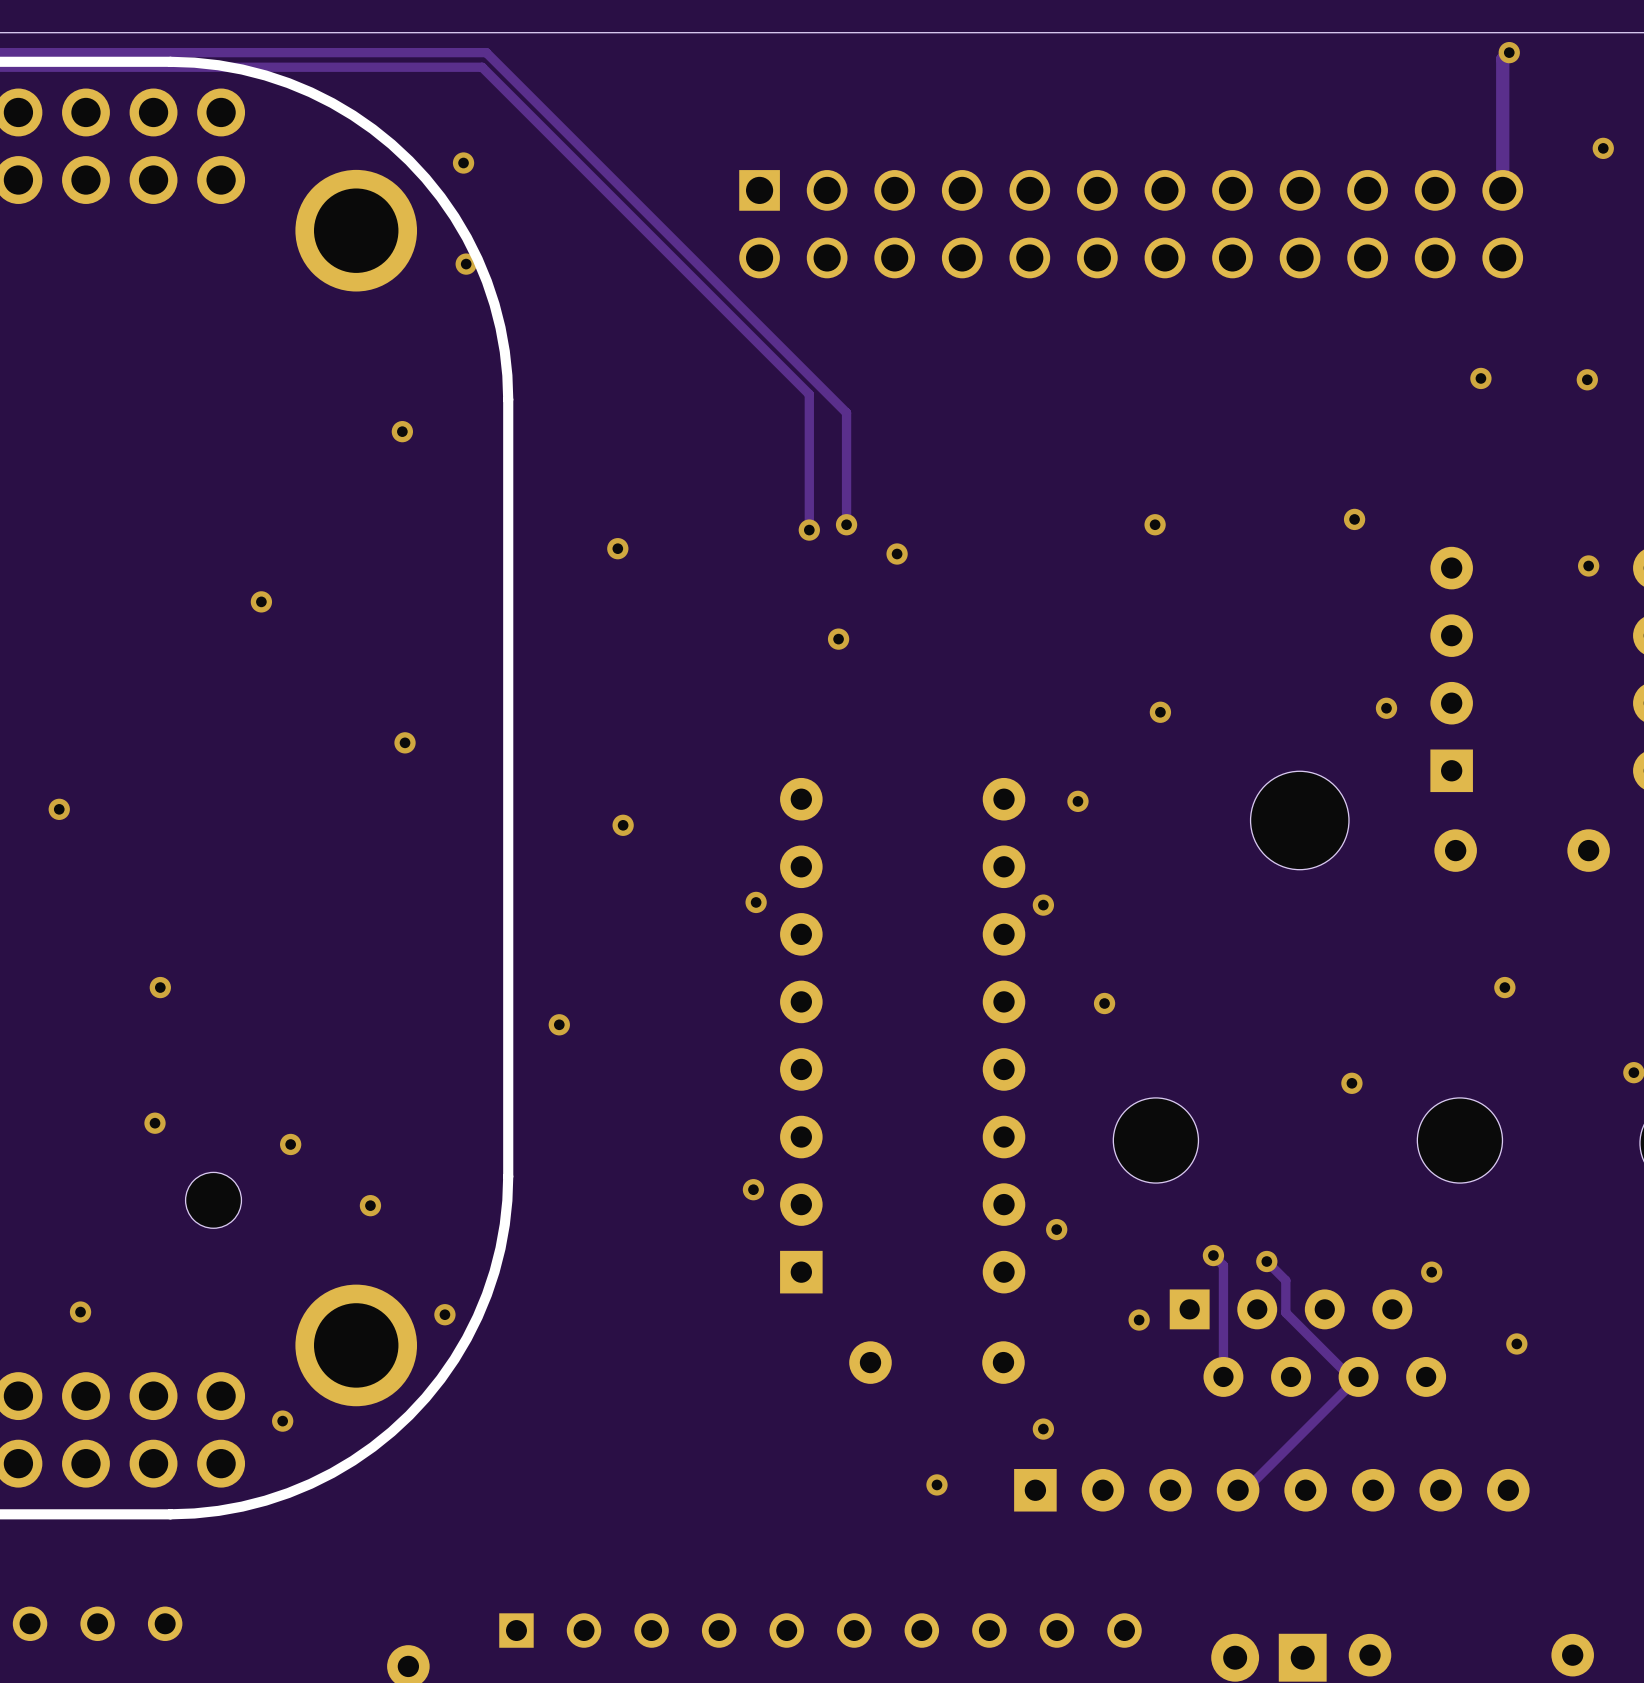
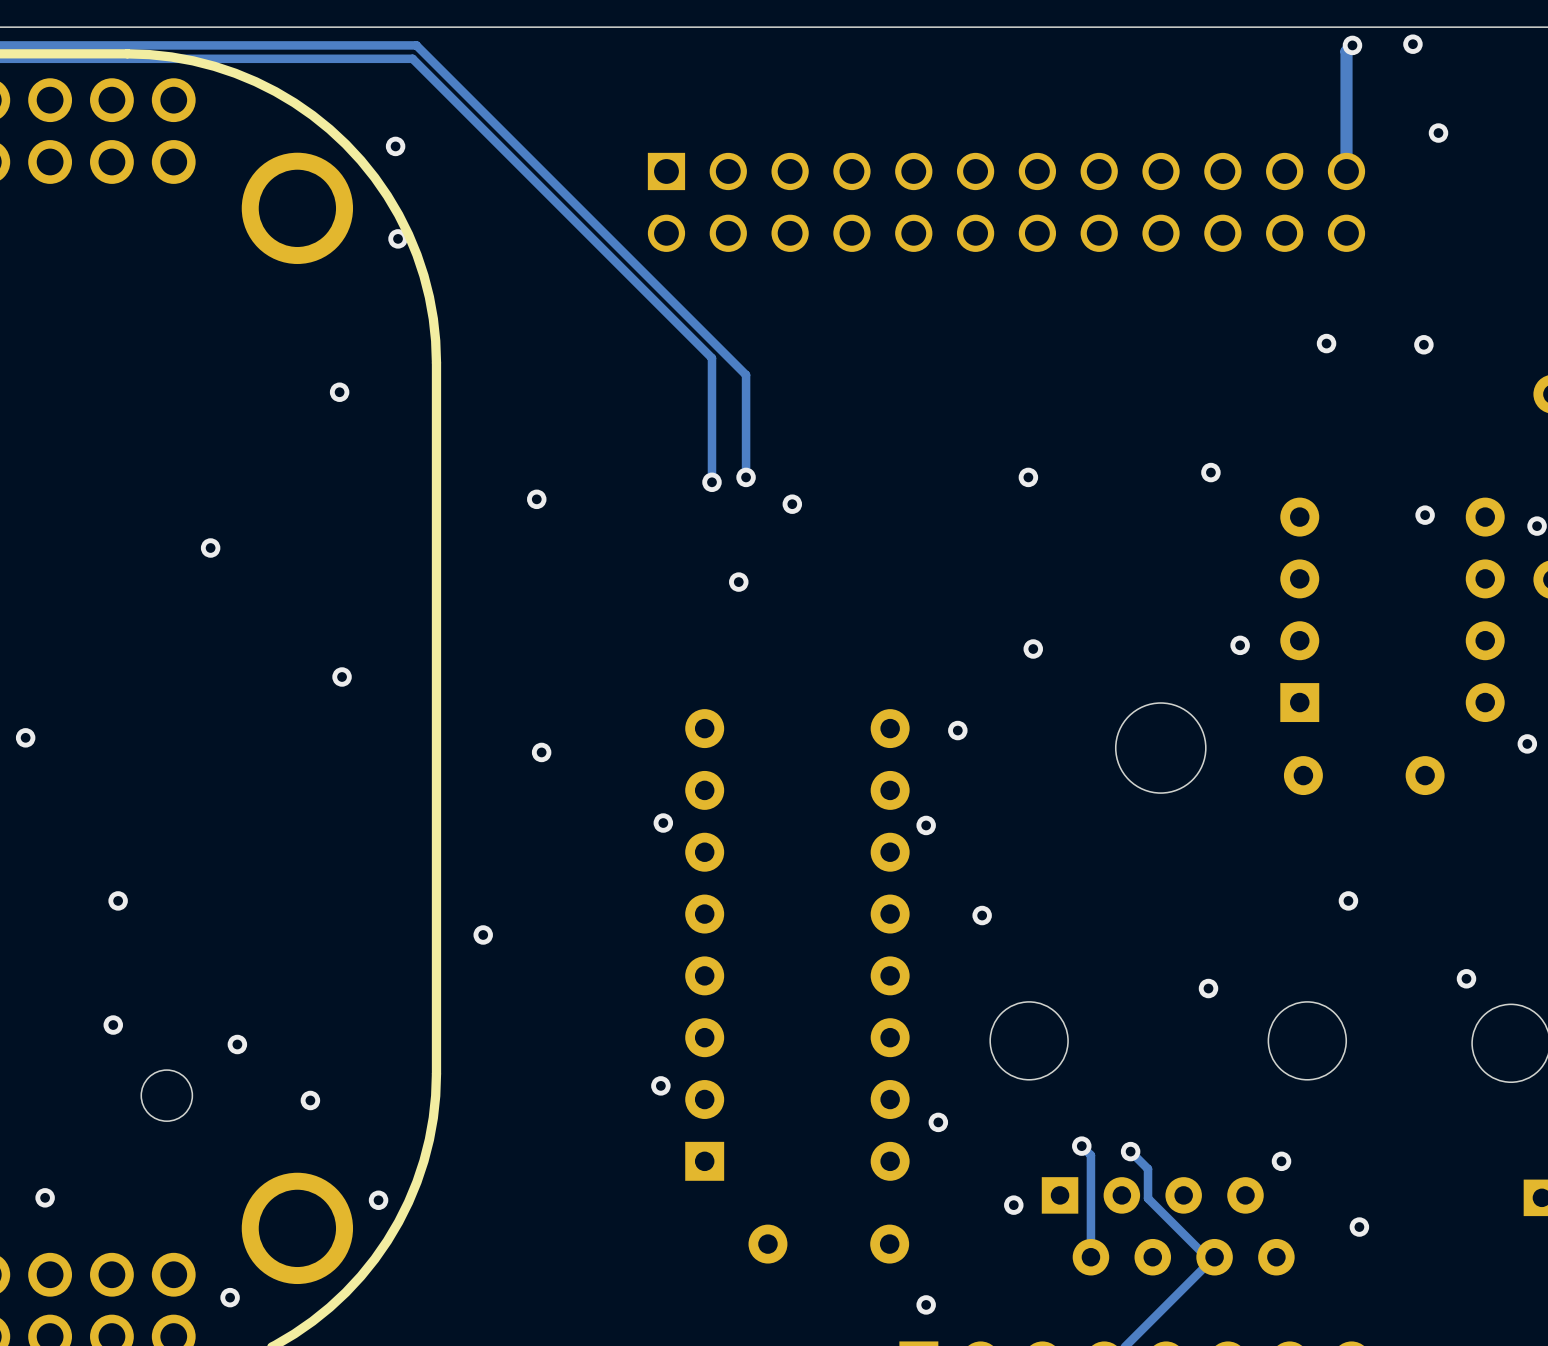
via: none -> (1412, 44)

